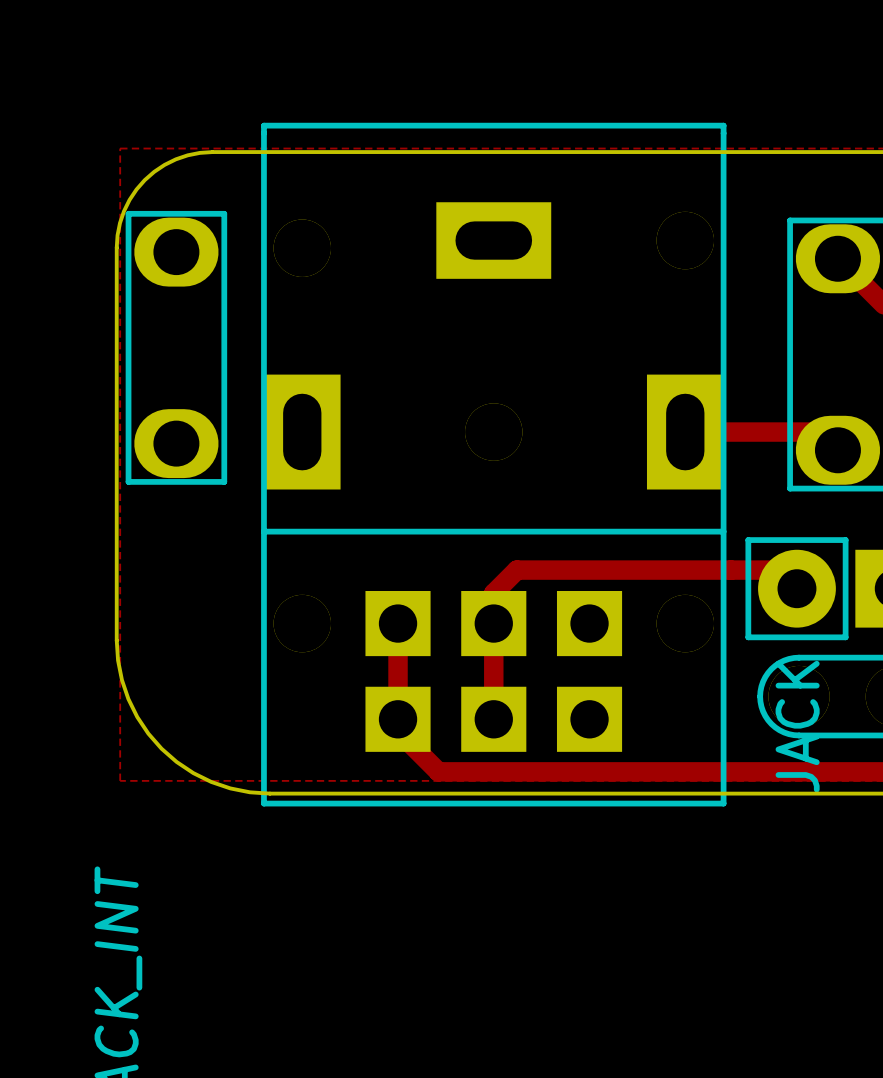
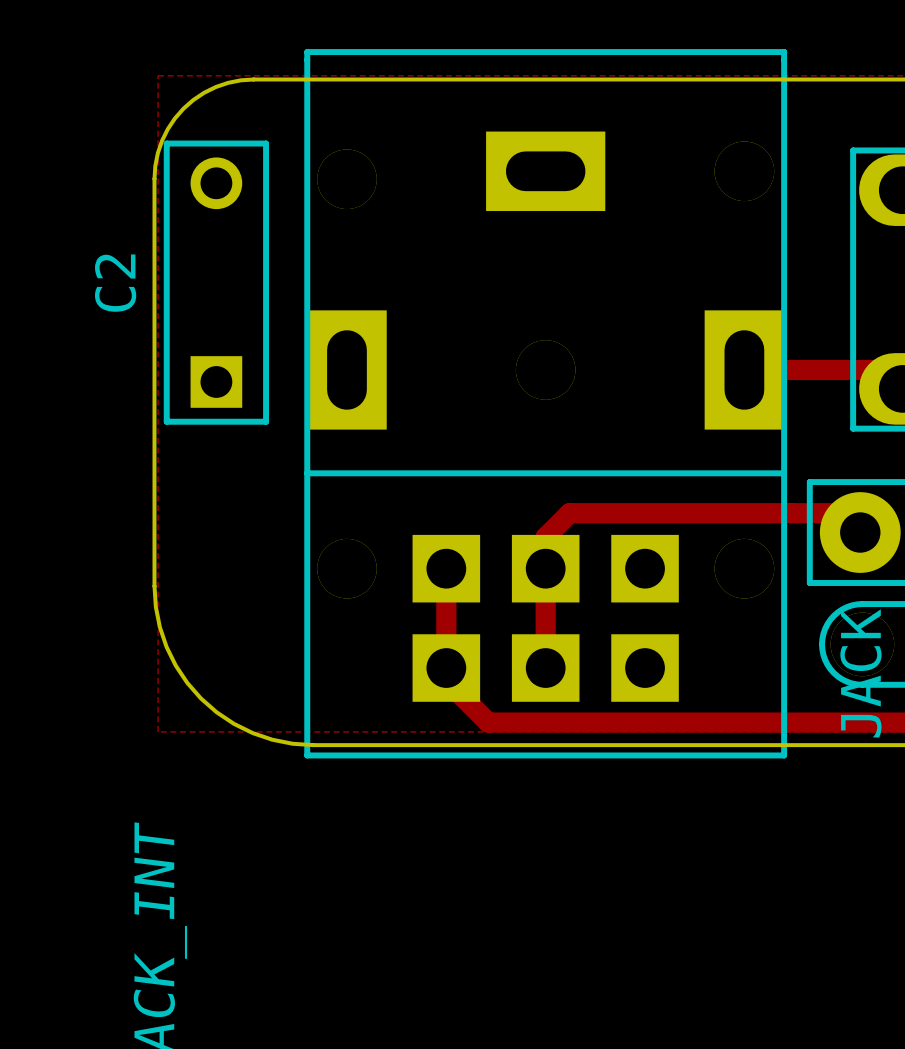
part: (176, 347) -> none
C2: none -> (216, 282)

